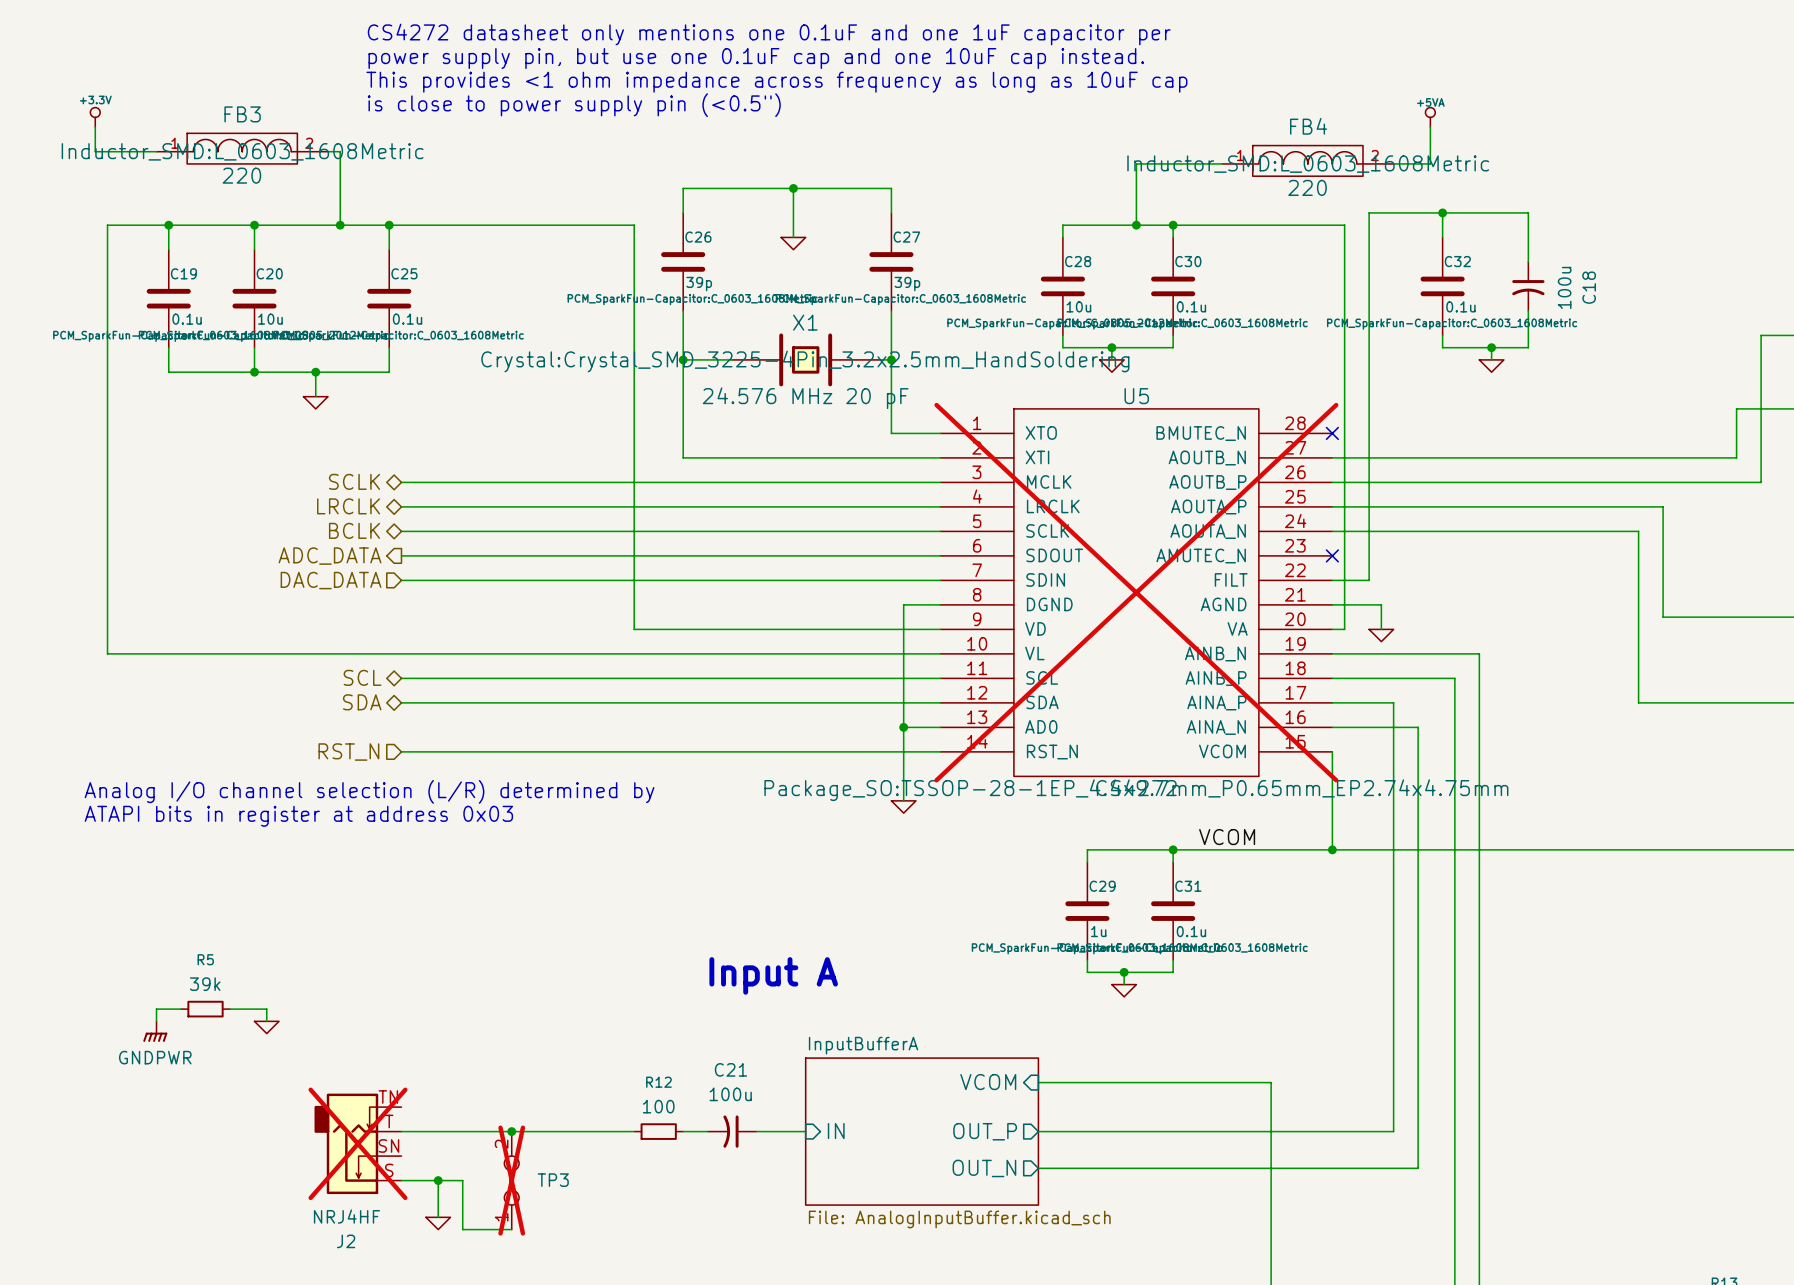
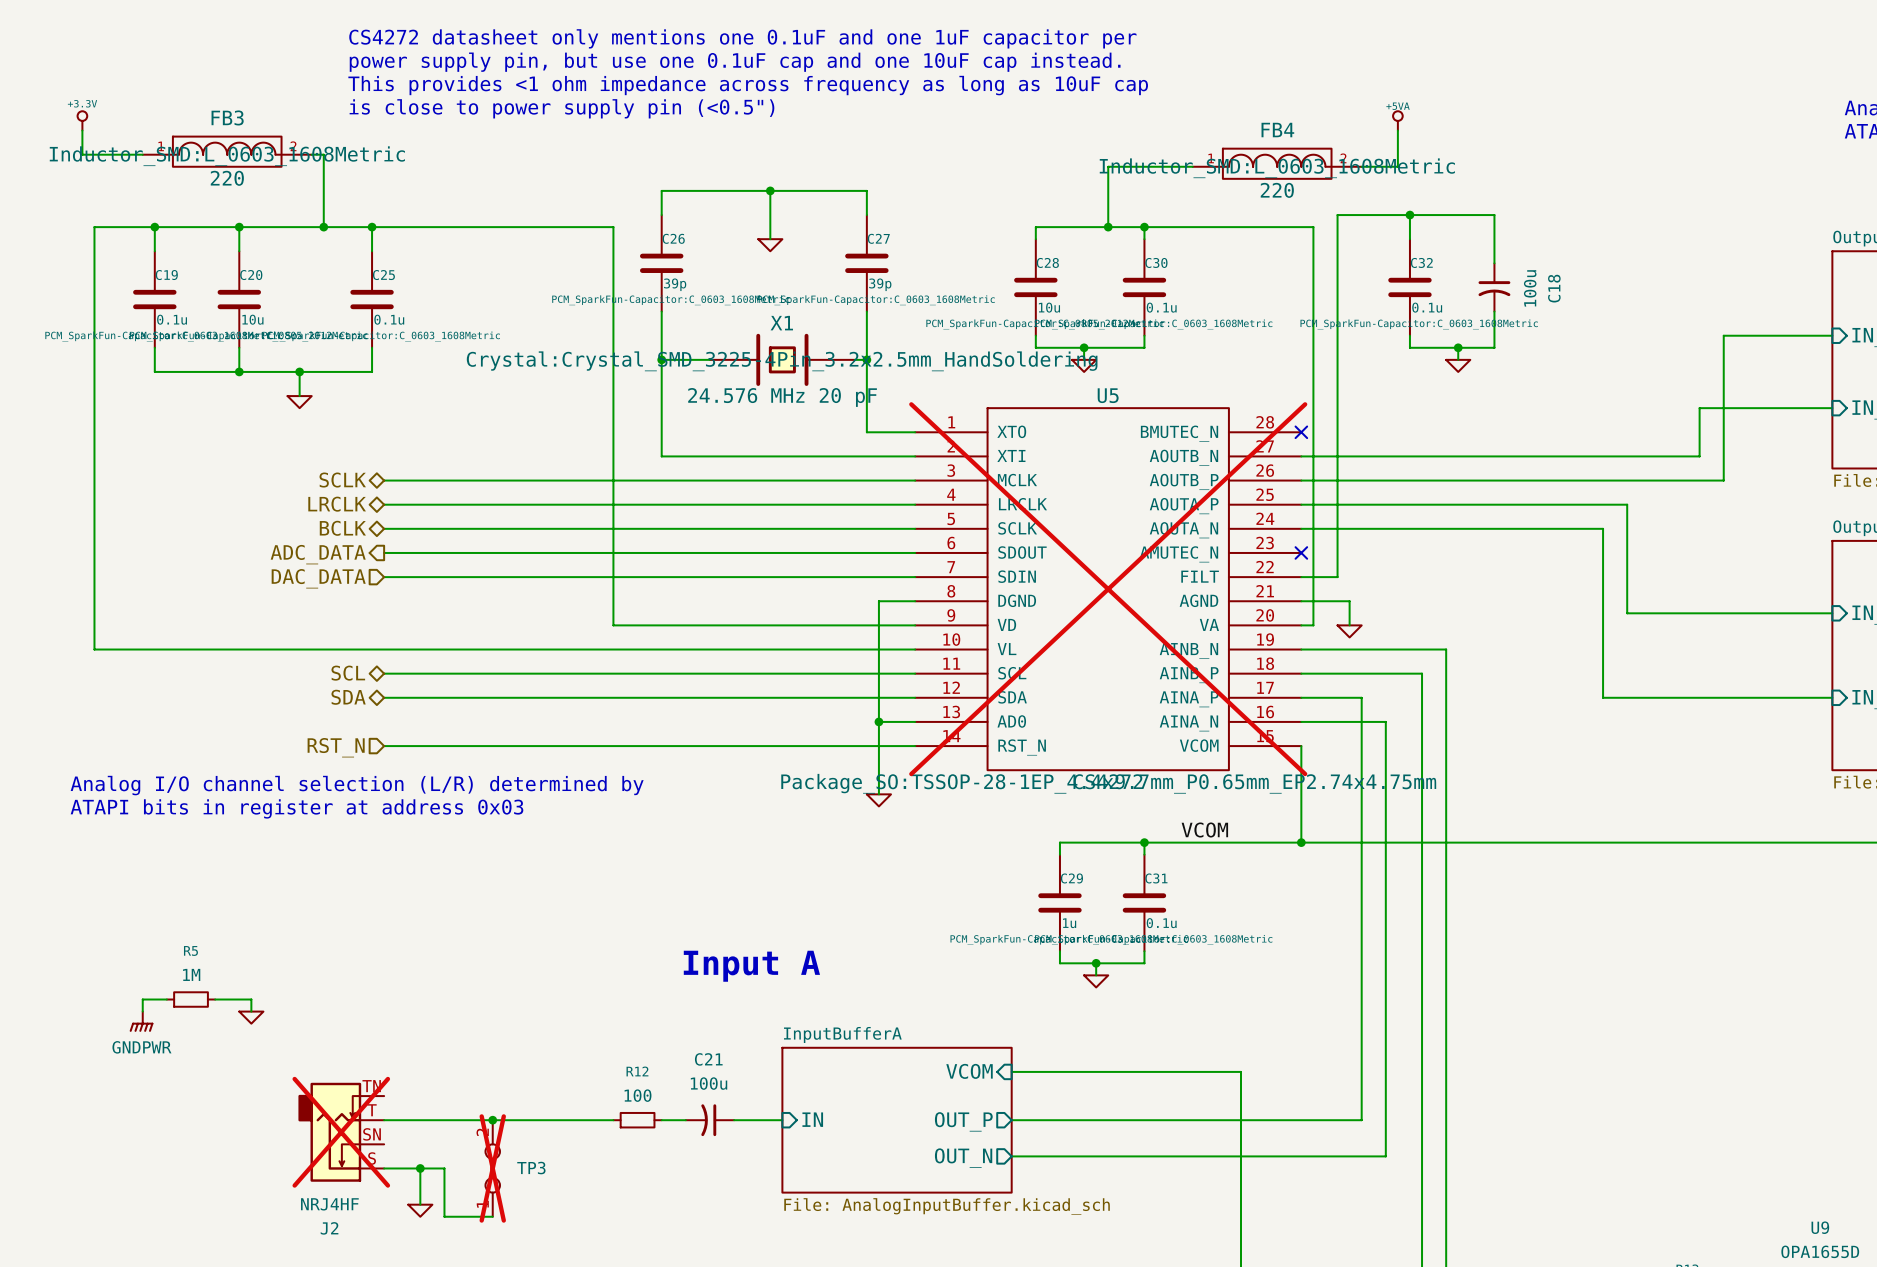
R5 value: 39k (205, 984) -> 1M (191, 974)

